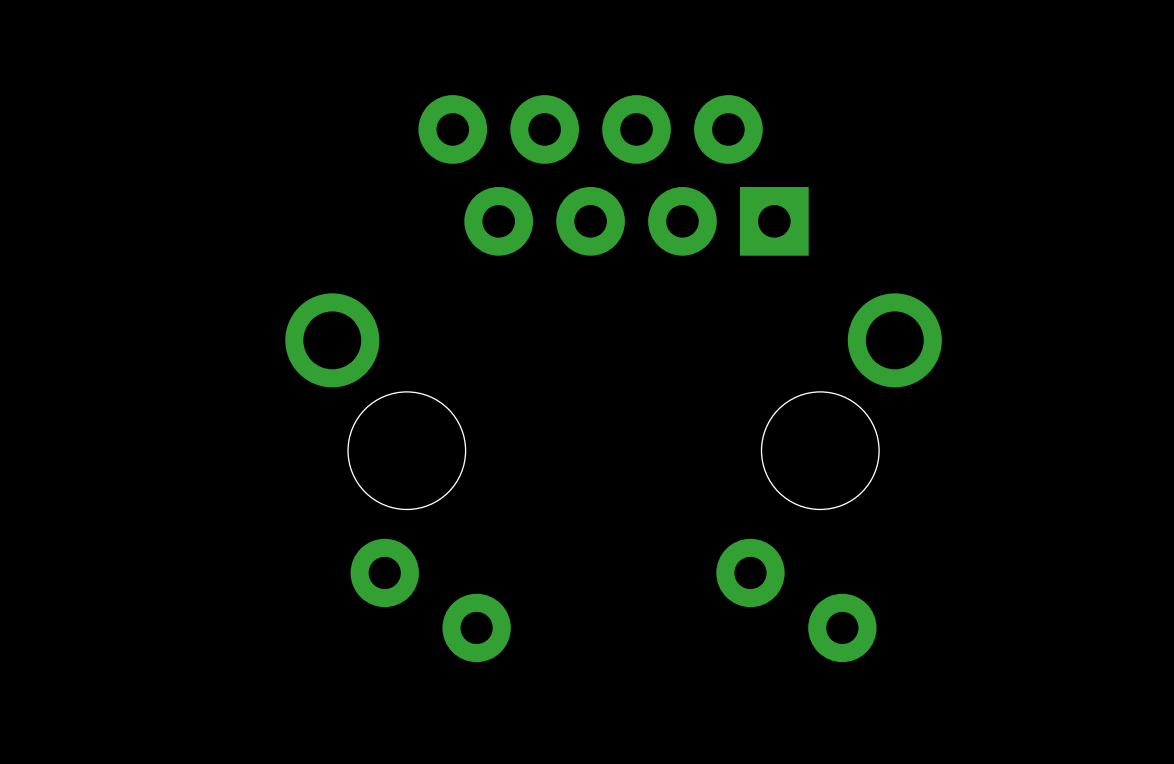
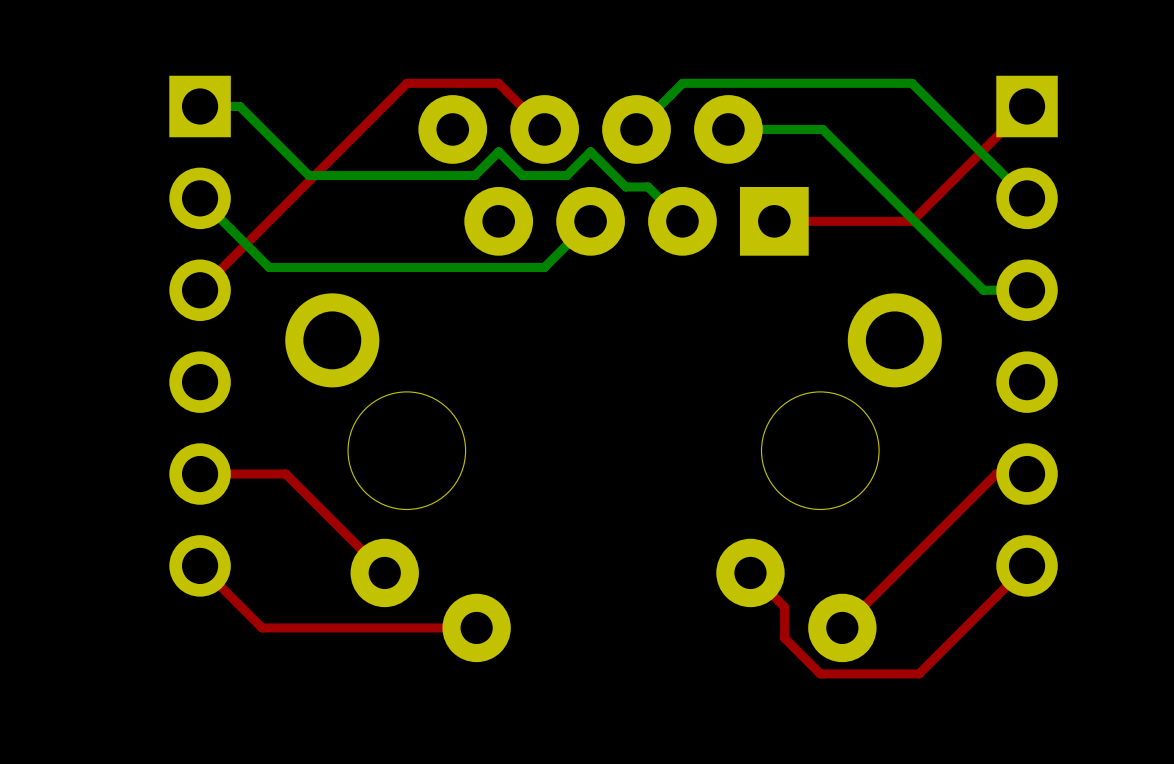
bottom track: none -> (200, 106) (239, 106) (308, 175) (474, 175) (498, 151) (522, 175) (566, 175) (590, 151) (625, 186) (648, 186) (682, 221)
top track: none -> (1027, 106) (912, 221) (774, 221)
top track: none -> (544, 129) (498, 83) (406, 83) (200, 290)
bottom track: none -> (636, 129) (682, 83) (912, 83) (1027, 198)
bottom track: none -> (728, 129) (822, 129) (983, 290) (1027, 290)
bottom track: none -> (200, 198) (269, 267) (544, 267) (590, 221)
part: none -> (200, 336)
part: none -> (1027, 336)
top track: none -> (200, 474) (285, 474) (384, 572)
top track: none -> (1027, 474) (996, 474) (842, 627)
top track: none -> (200, 565) (262, 627) (476, 627)
top track: none -> (1027, 565) (919, 673) (820, 673) (784, 638) (784, 607) (750, 572)

